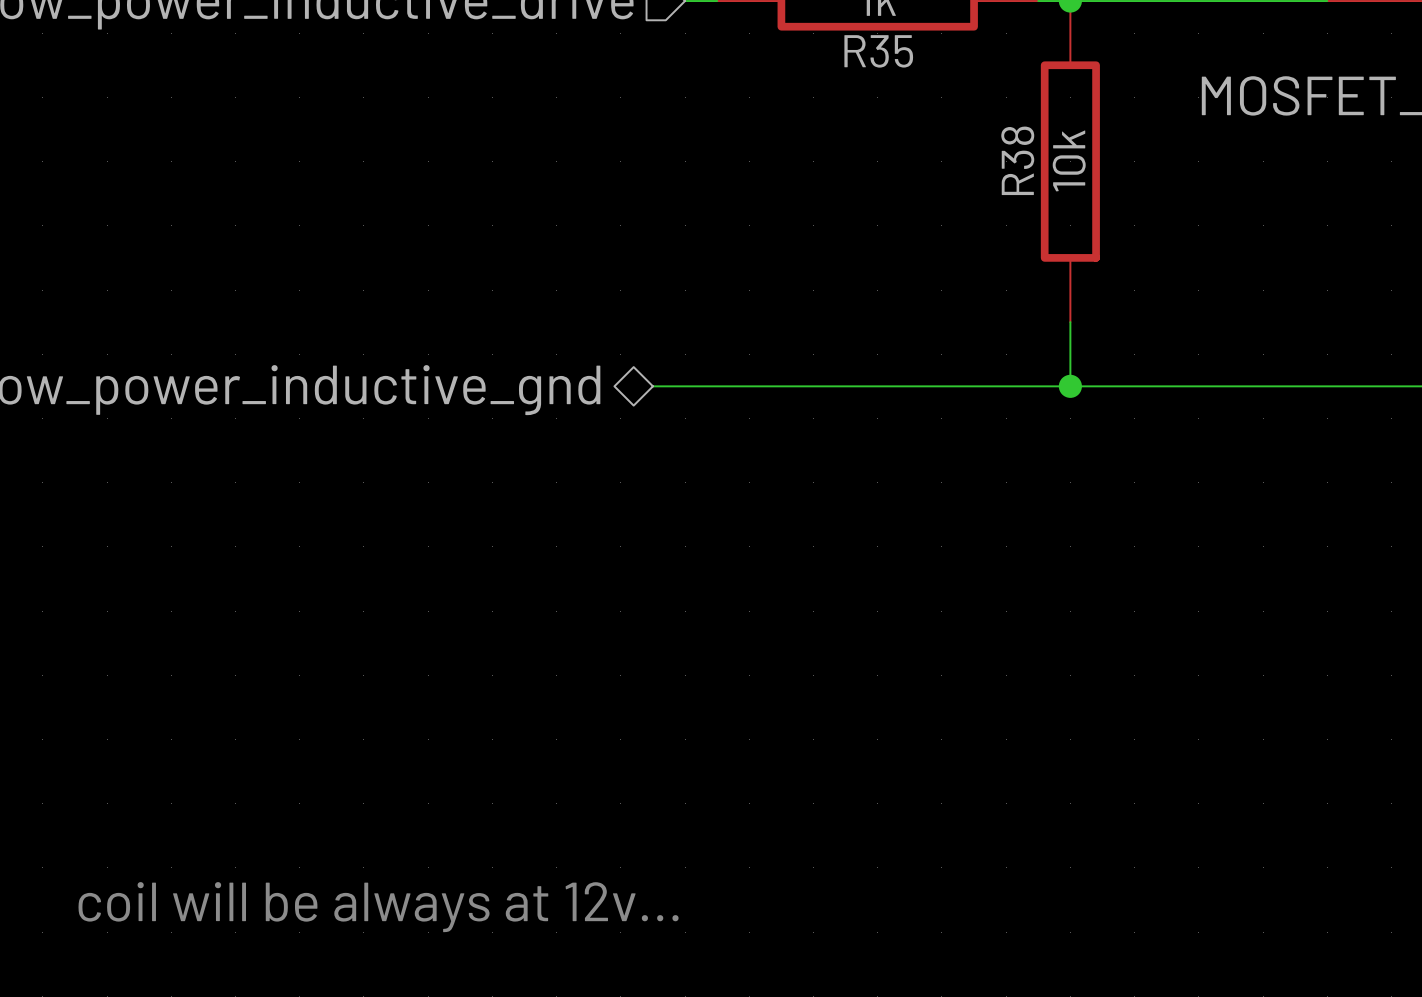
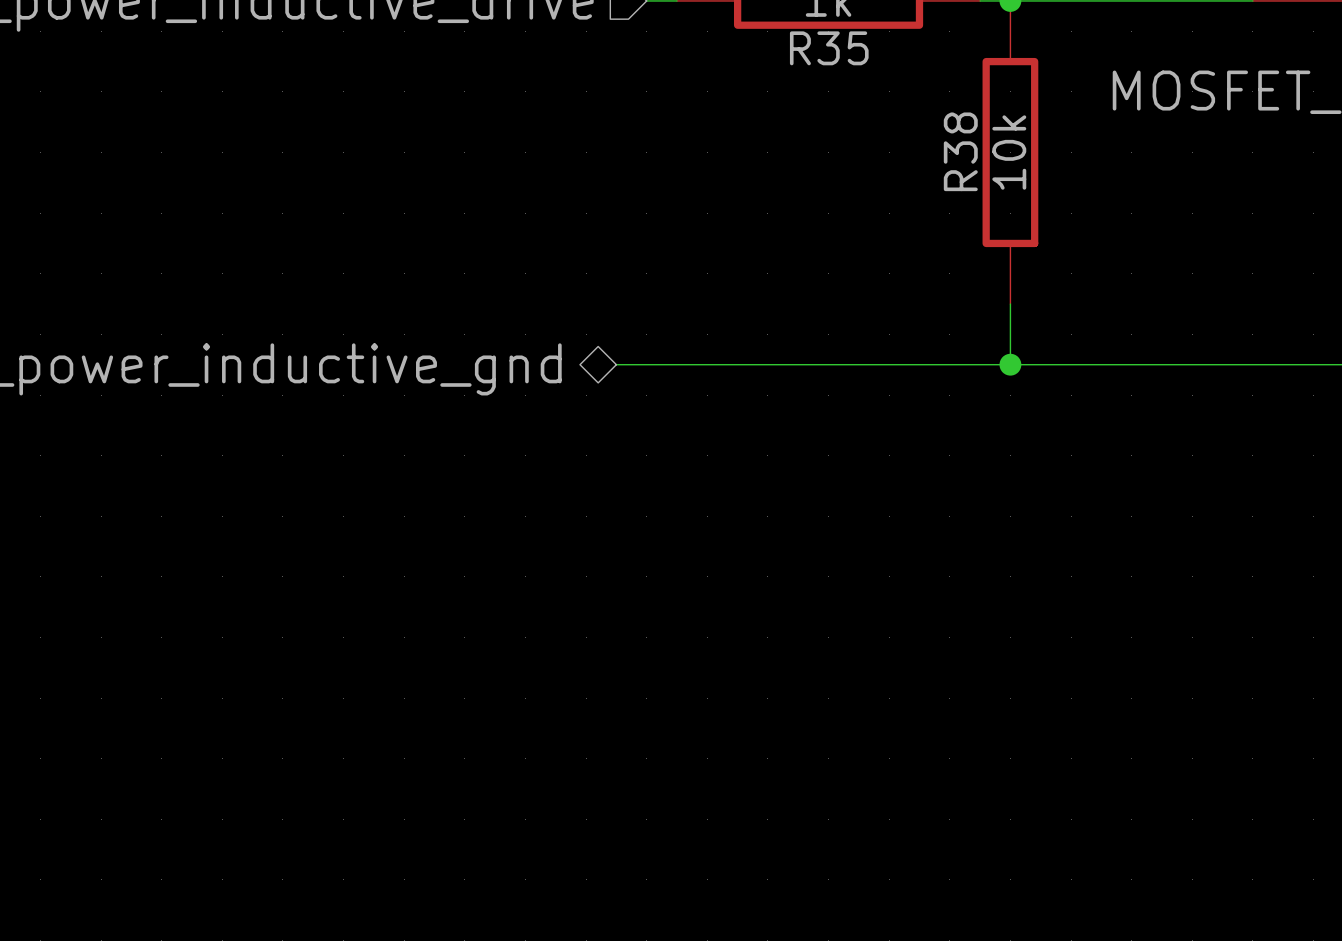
text: coil will be always at 12v... (378, 907) -> none

